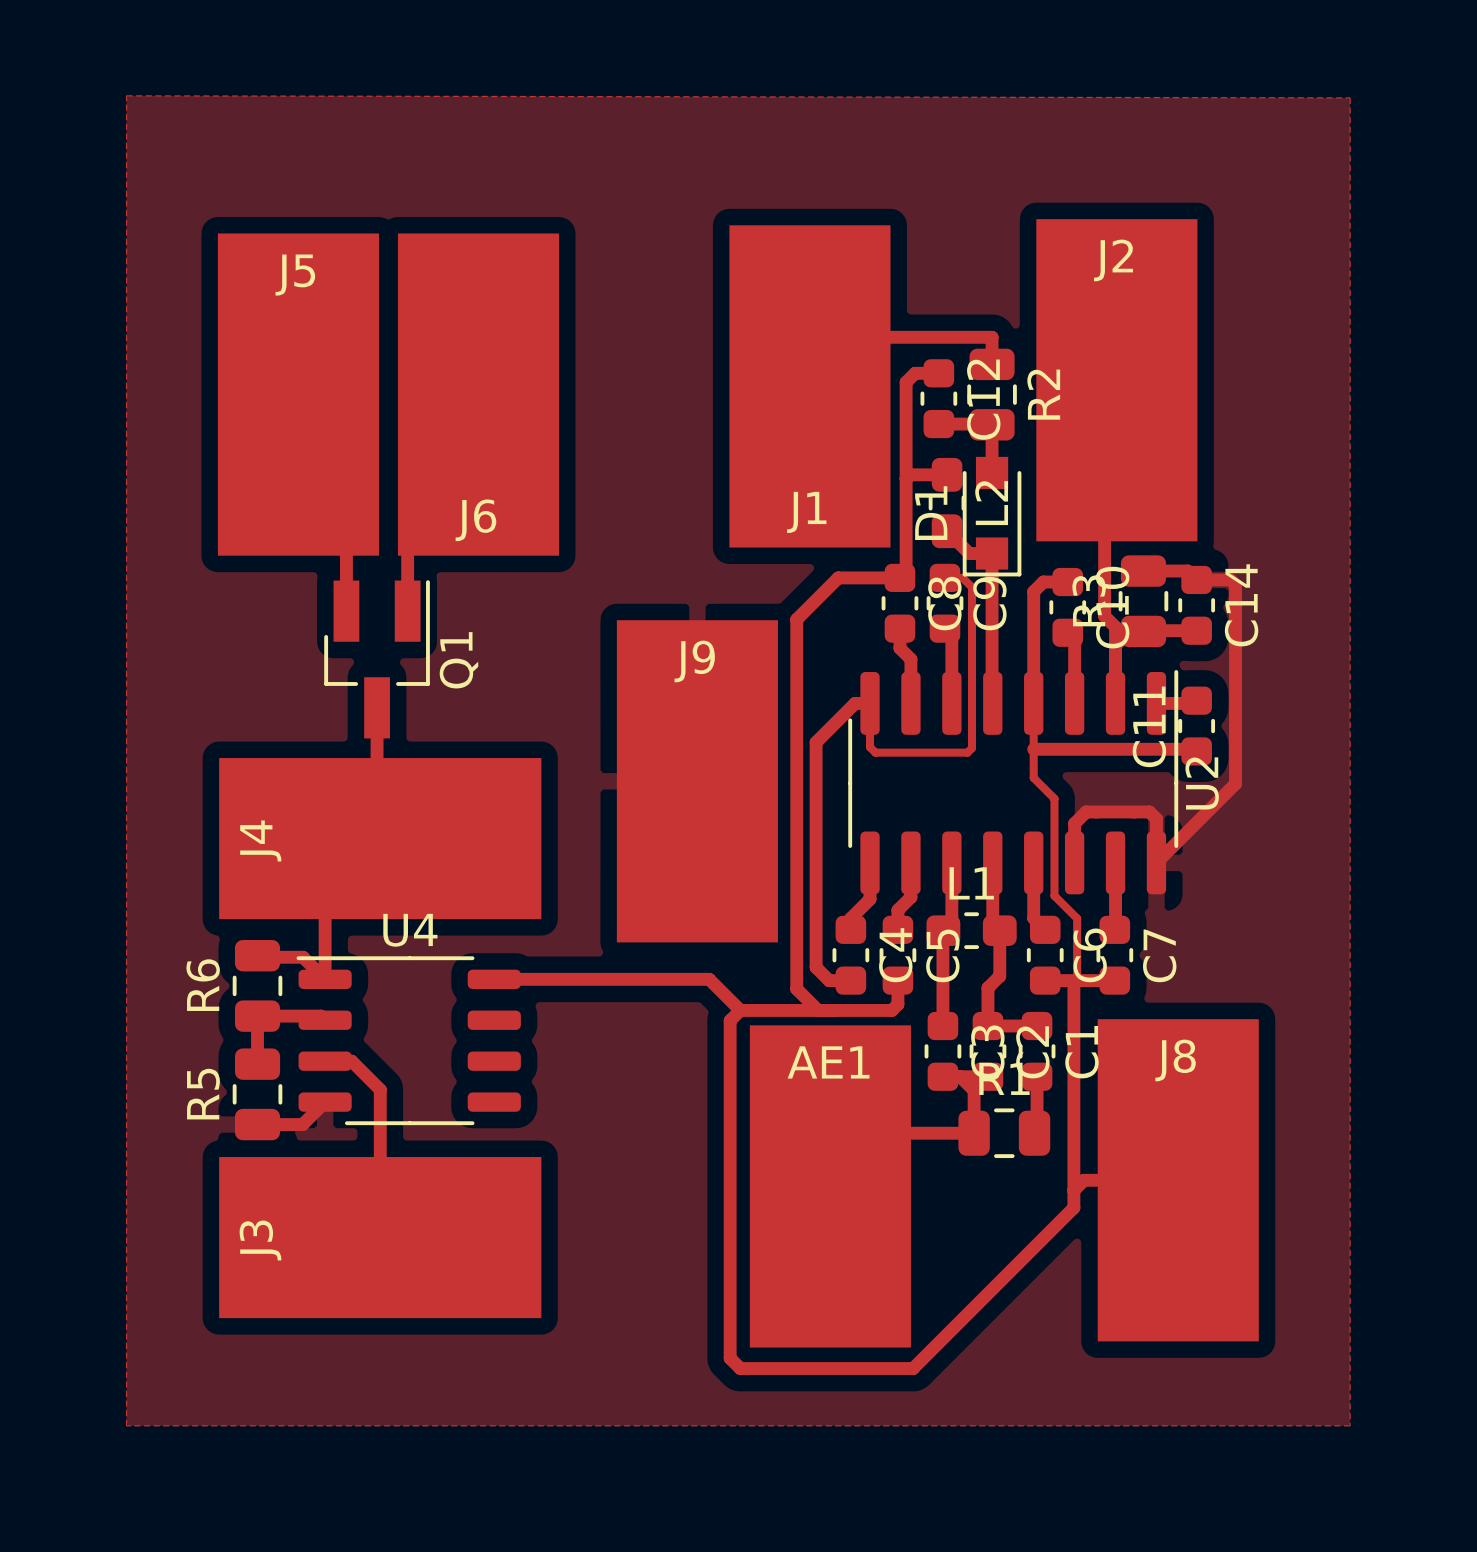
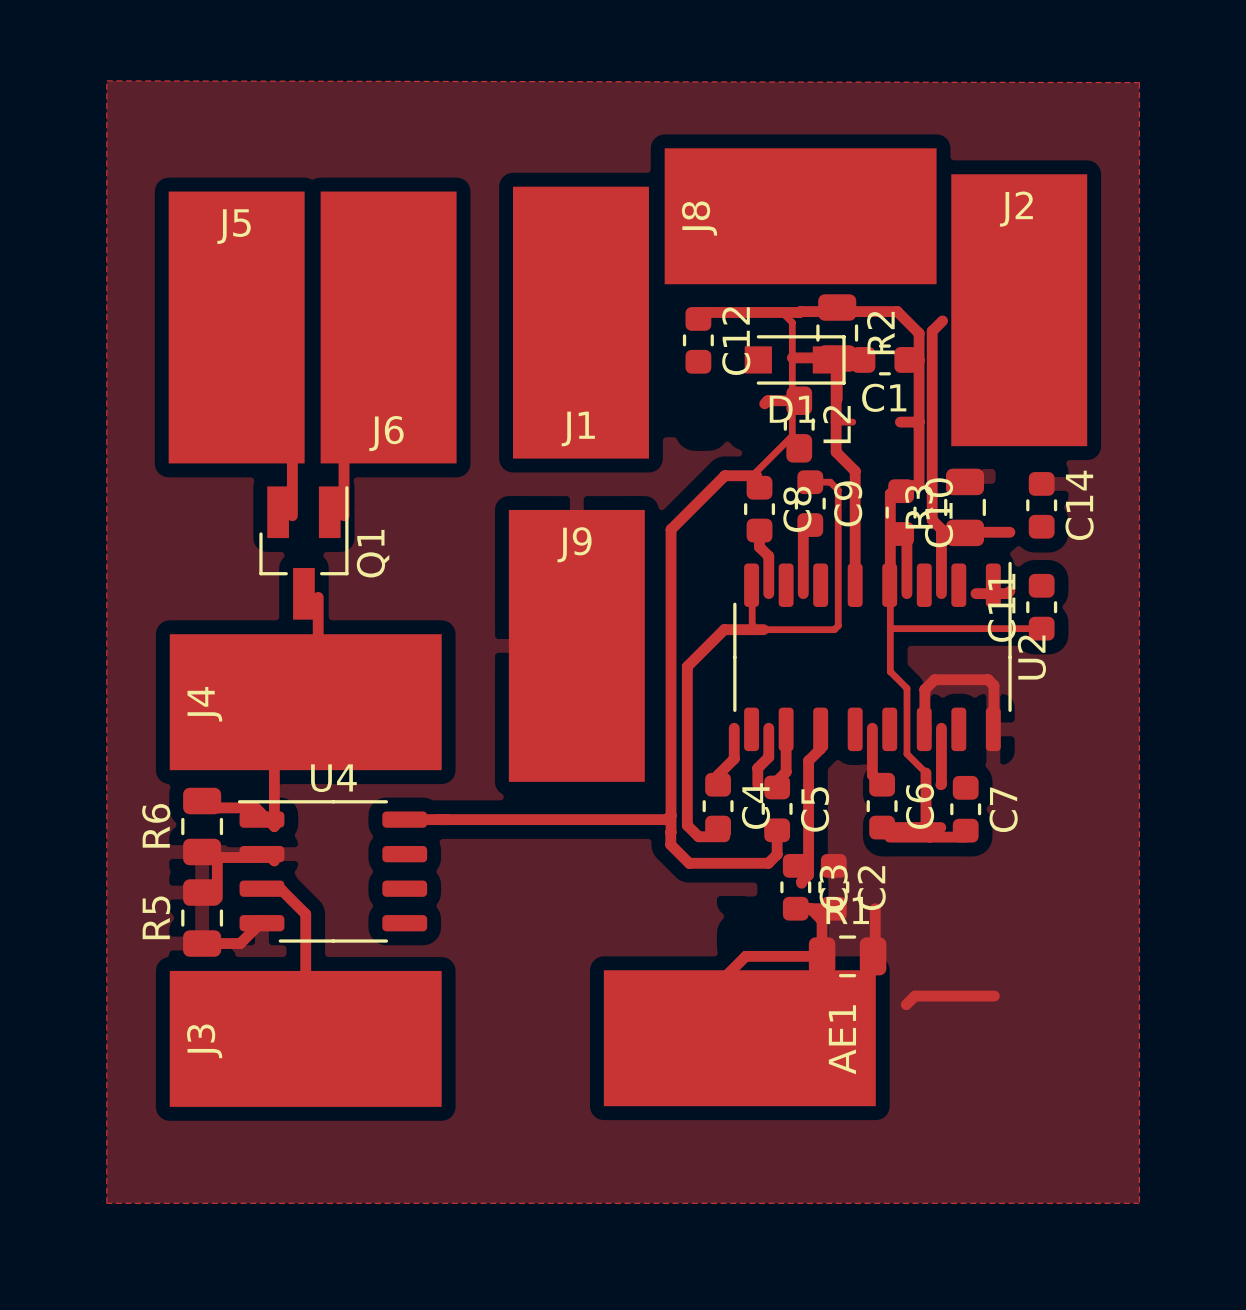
top track: (992, 364) (992, 337) (859, 337) (809, 386) -> none
top track: (938, 373) (915, 373) (906, 382) (906, 571) (899, 577) (838, 577) (796, 619) (796, 989) (818, 1010) -> none
J2 position: (1116, 380) -> (1019, 310)
J1 position: (809, 386) -> (580, 322)
J5 position: (298, 394) -> (236, 327)
J6 position: (478, 394) -> (388, 327)
C12 position: (938, 398) -> (698, 340)
top track: none -> (832, 359) (836, 363) (836, 452) (855, 471) (855, 585)
top track: none -> (836, 422) (852, 422)
top track: none -> (900, 422) (918, 422)
D1 rotation: 0° (992, 516) -> 90° counterclockwise (795, 359)
D1 position: (992, 516) -> (795, 359)
top track: (947, 531) (969, 553) (992, 553) (992, 703) -> none
top track: none -> (815, 482) (830, 482) (838, 490) (838, 625) (834, 629) (756, 629) (752, 625) (752, 588)
top track: (1143, 571) (1187, 571) (1196, 579) (1230, 579) (1235, 584) (1235, 783) (1156, 862) (1156, 818) (1149, 811) (1086, 811) (1074, 823) (1074, 862) -> none
top track: (944, 577) (962, 577) (971, 587) (971, 748) (967, 752) (875, 752) (870, 747) (870, 703) (855, 703) (816, 742) (816, 967) (829, 980) (850, 980) -> none
top track: (1067, 582) (1043, 582) (1033, 591) (1033, 777) (1054, 798) (1054, 895) (1077, 918) (1077, 980) (1073, 983) (1073, 1207) (913, 1368) (740, 1368) (730, 1358) (730, 1020) (740, 1010) -> none
C9 position: (944, 603) -> (810, 503)
C14 position: (1196, 605) -> (1041, 505)
Q1 position: (377, 659) -> (303, 552)
U2 footprint: [848, 670, 1179, 895] -> [733, 561, 1012, 752]
C11 position: (1196, 726) -> (1041, 607)
top track: none -> (890, 626) (892, 628) (1041, 628)
top track: none -> (763, 629) (724, 629) (687, 666) (687, 825) (698, 836) (724, 836)
top track: (1033, 749) (1194, 749) (1196, 751) -> none
J9 position: (697, 781) -> (576, 645)
U2 name position: U2 (1202, 783) -> U2 (1031, 657)
J4 position: (380, 838) -> (305, 702)
top track: none -> (924, 722) (924, 689) (934, 679) (988, 679) (993, 685) (993, 722)
top track: (951, 862) (951, 922) (942, 931) (942, 1026) -> none
top track: (992, 862) (992, 923) (999, 930) (999, 976) (987, 987) (987, 1026) (1037, 1026) -> none
top track: none -> (786, 729) (786, 772) (777, 781)
top track: none -> (820, 729) (820, 748) (808, 760) (808, 874) (801, 883)
L1: (971, 930) -> none
C5 position: (897, 955) -> (777, 808)
C7 position: (1114, 955) -> (965, 809)
top track: none -> (671, 815) (666, 819) (404, 819)
top track: (494, 979) (709, 979) (740, 1010) -> none
top track: (897, 980) (897, 1004) (891, 1010) (740, 1010) -> none
R6 position: (257, 985) -> (202, 826)
top track: none -> (670, 832) (670, 844) (689, 863) (768, 863) (777, 854) (777, 836)
top track: none -> (671, 832) (671, 529) (724, 475) (756, 475) (756, 471) (792, 435) (792, 322) (782, 312) (698, 312) (897, 311) (919, 333) (919, 485) (898, 485) (890, 493) (890, 671) (906, 688) (906, 753) (925, 772) (925, 833) (929, 837)
top track: none -> (889, 837) (965, 837)
U4 position: (408, 1040) -> (332, 871)
C1 rotation: 0° (1037, 1051) -> 90° clockwise (884, 359)
C1 position: (1037, 1051) -> (884, 359)
J8 name position: J8 (1175, 1060) -> J8 (699, 218)
top track: (325, 1061) (351, 1061) (380, 1089) (380, 1237) -> (259, 890) (281, 890) (305, 914) (305, 1038)
R5 position: (257, 1094) -> (202, 918)
top track: (325, 1102) (302, 1124) (257, 1124) -> (259, 924) (240, 943) (202, 943)
J8 rotation: 0° (1178, 1180) -> 90° clockwise (800, 216)
J8 position: (1178, 1180) -> (800, 216)
AE1 rotation: 0° (830, 1186) -> 90° clockwise (739, 1038)
J3 position: (380, 1237) -> (305, 1038)

